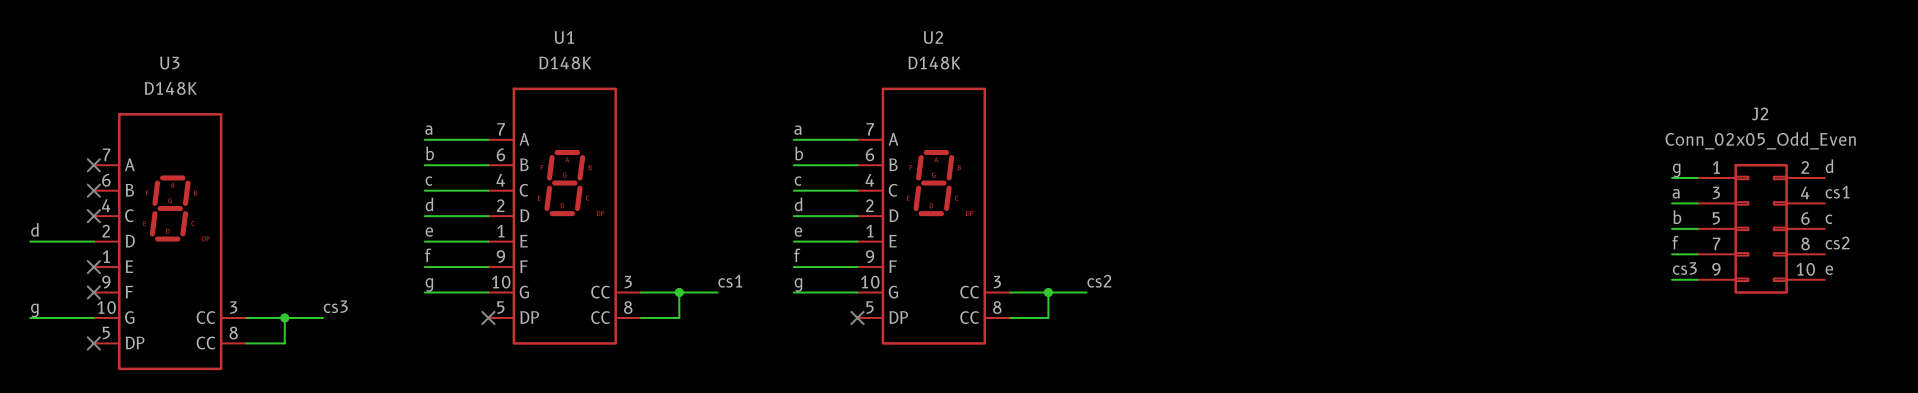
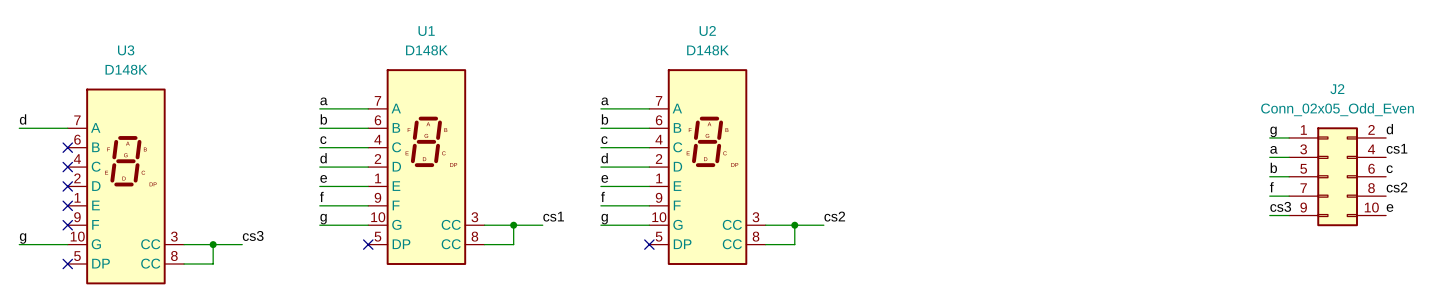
no-connect mark: (93, 165) -> none
label position: d (34, 229) -> d (23, 119)
wire: (30, 241) (93, 241) -> (19, 128) (67, 128)
no-connect mark: none -> (67, 186)

